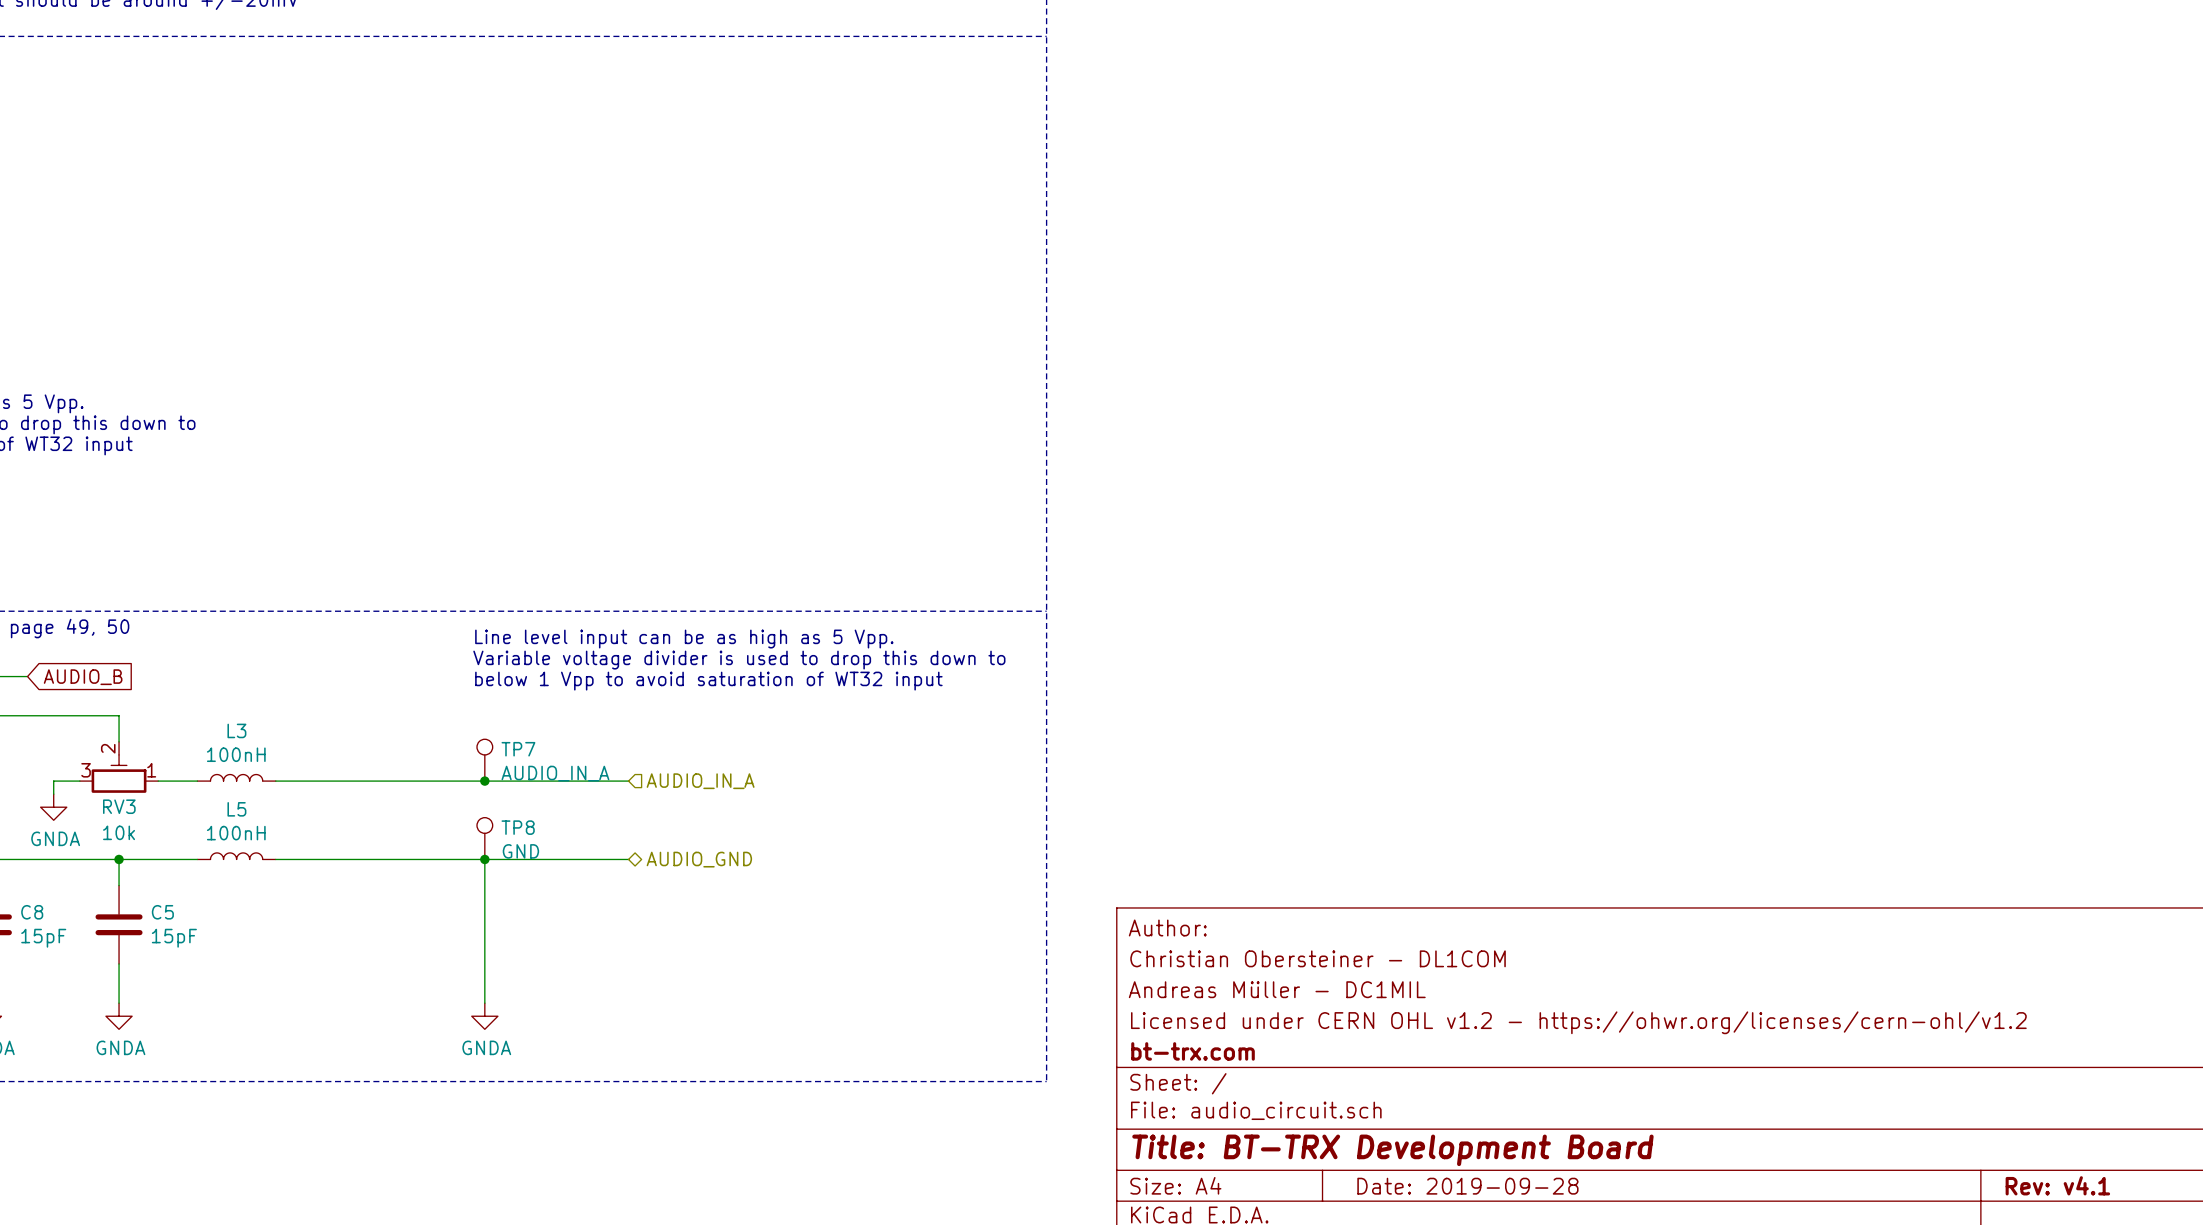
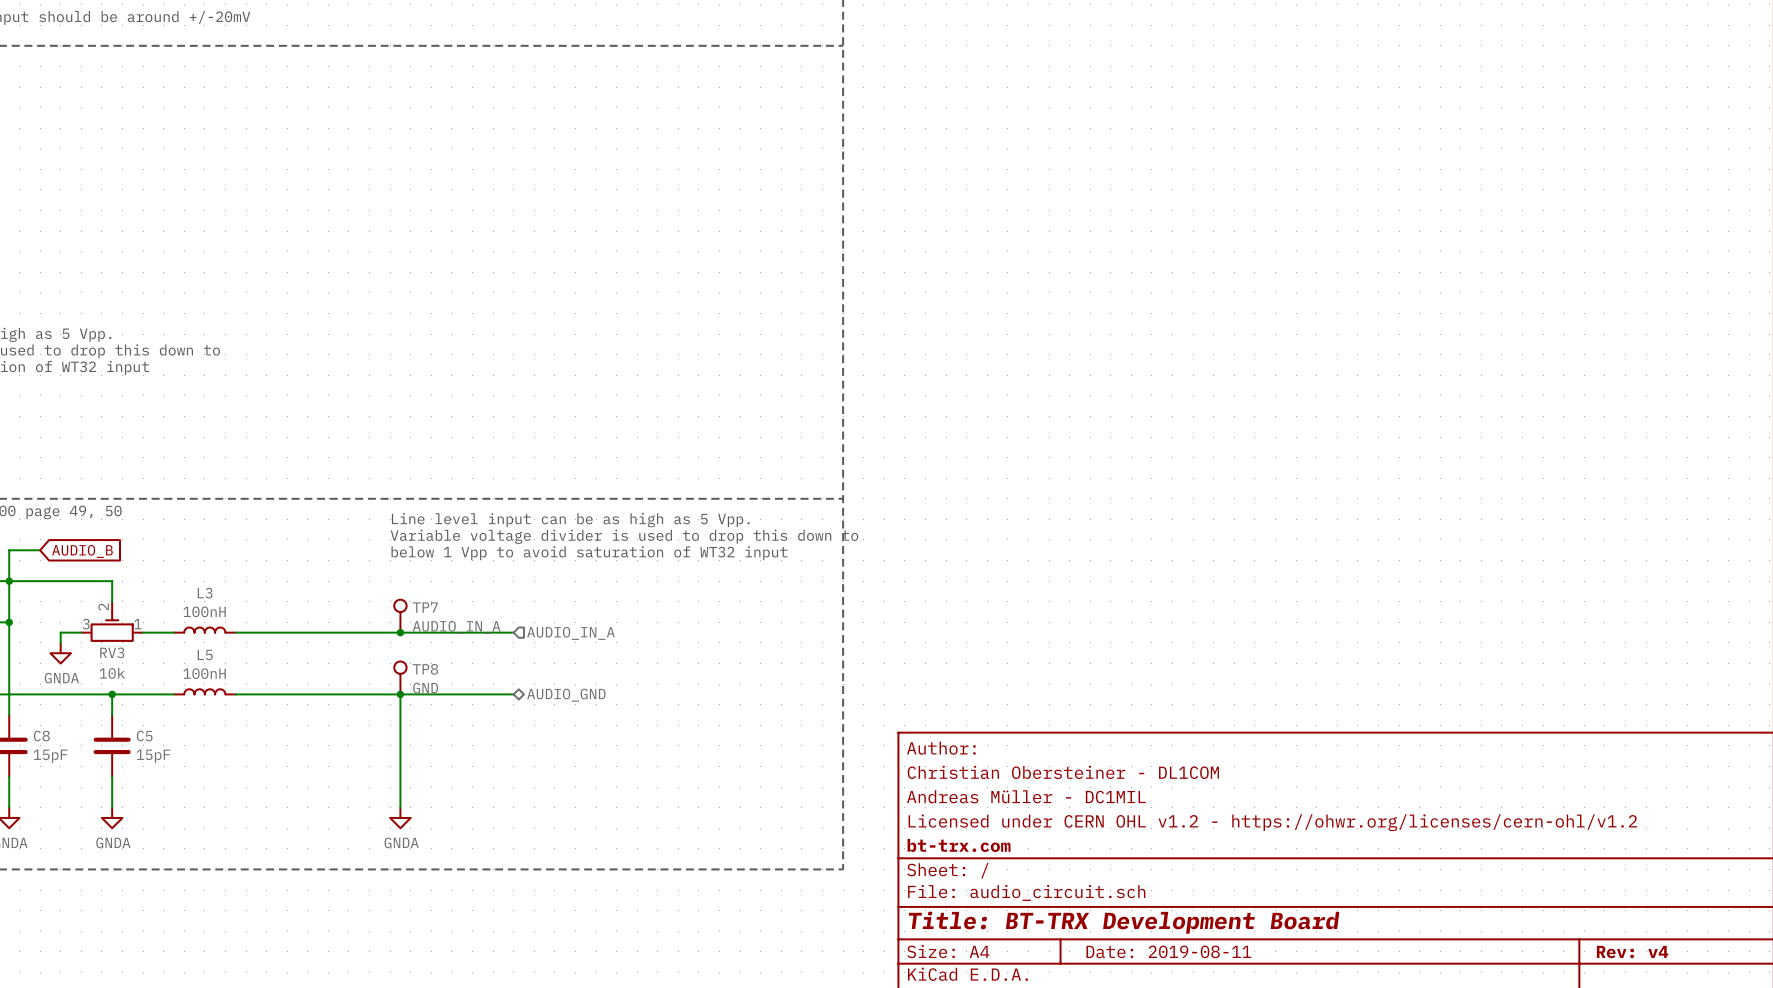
title block: Rev: v4.1 (2057, 1185) -> Rev: v4 (1632, 951)
title block: Date: 2019-09-28 (1467, 1186) -> Date: 2019-08-11 (1168, 951)

